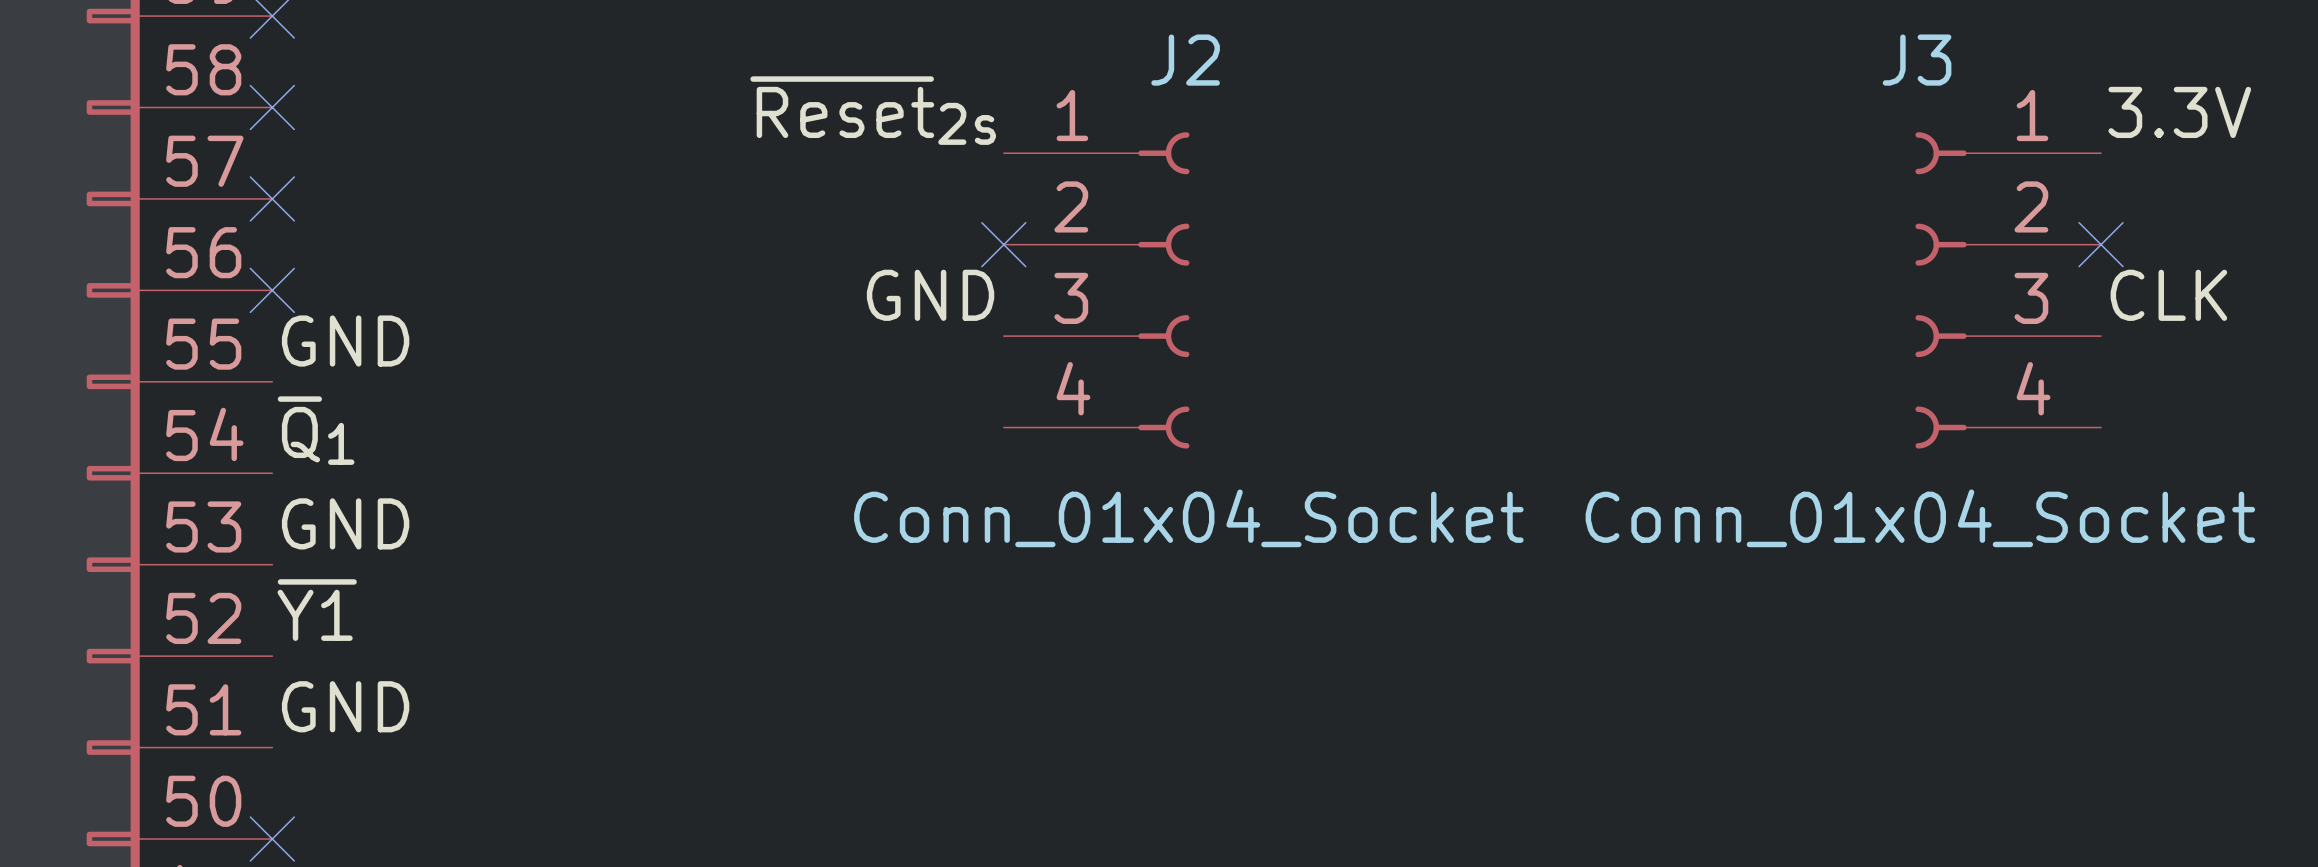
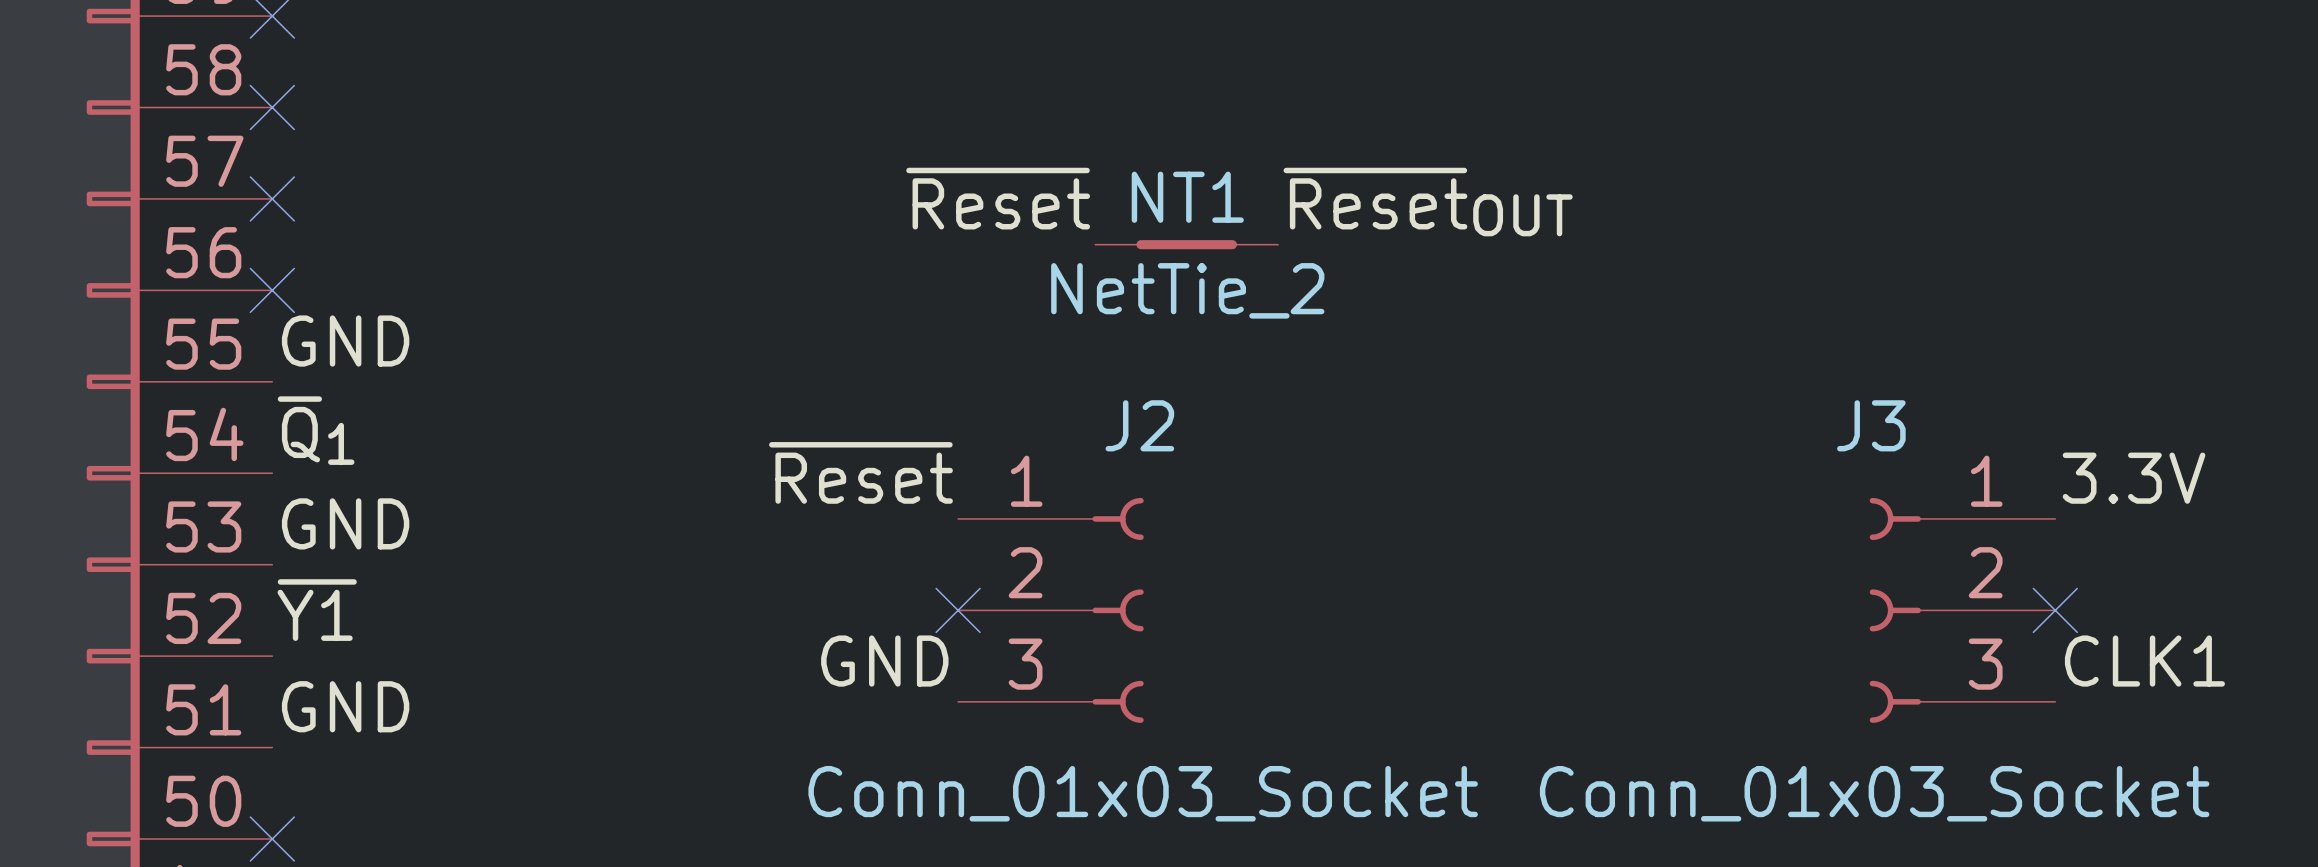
label: ~{Reset}2s (873, 110) -> ~{Reset} (998, 198)
label position: 3.3V (2179, 112) -> 3.3V (2134, 478)
J2 symbol: [1003, 132, 1190, 449] -> [958, 497, 1144, 723]
J3 symbol: [1915, 132, 2102, 449] -> [1869, 497, 2056, 723]
label: none -> ~{Reset}OUT (1428, 202)
no-connect mark: (1003, 244) -> none
NT1: none -> NetTie_2 (1186, 244)
no-connect mark: (2101, 244) -> none
label position: GND (930, 295) -> GND (884, 661)
label: CLK (2168, 295) -> none
label: none -> ~{Reset} (860, 472)
J2 value: Conn_01x04_Socket (1188, 518) -> Conn_01x03_Socket (1143, 793)
J3 value: Conn_01x04_Socket (1920, 518) -> Conn_01x03_Socket (1874, 793)
no-connect mark: none -> (958, 610)
no-connect mark: none -> (2055, 610)
label: none -> CLK1 (2144, 661)

